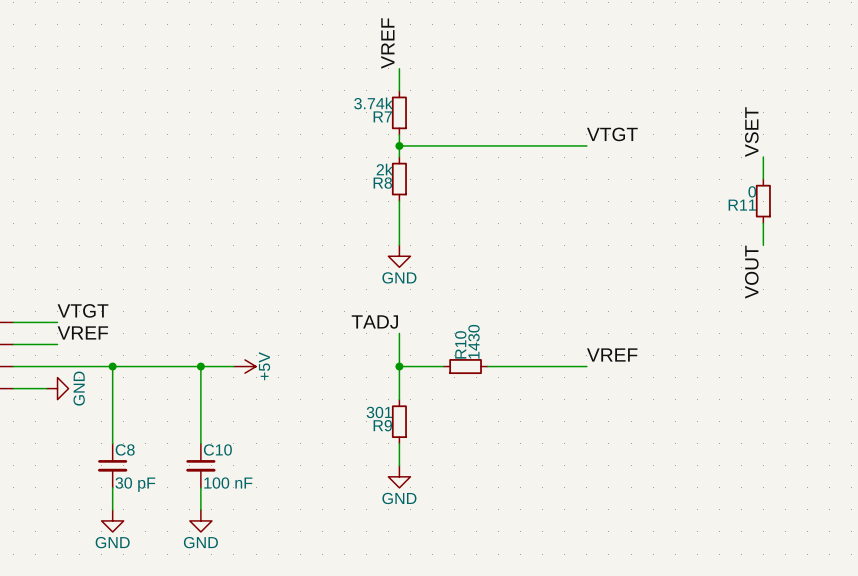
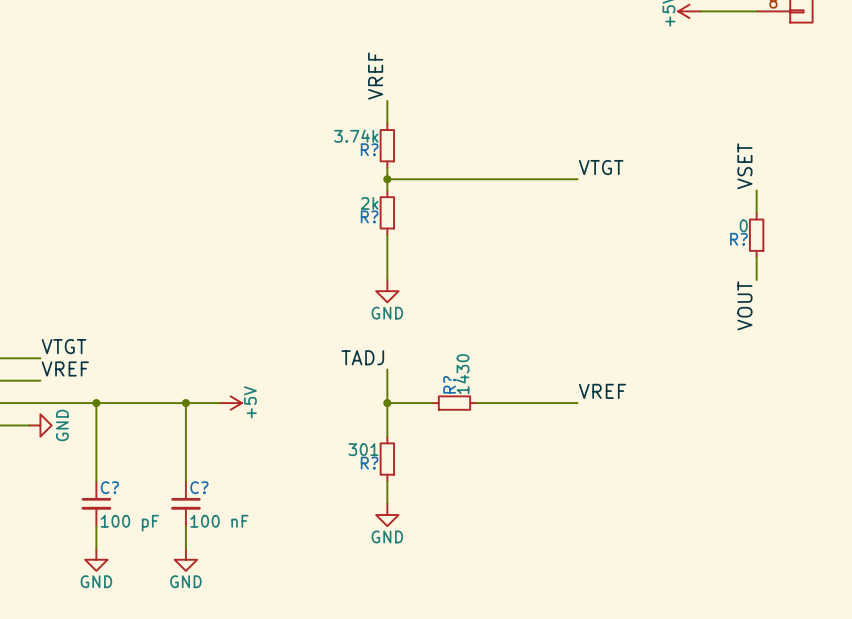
R7 name: R7 (382, 116) -> R? (369, 149)
R8 name: R8 (382, 183) -> R? (369, 216)
R11 name: R11 (742, 205) -> R? (738, 239)
R10 name: R10 (460, 344) -> R? (449, 384)
R9 name: R9 (382, 425) -> R? (369, 463)
C8 name: C8 (125, 449) -> C? (109, 487)
C10 name: C10 (217, 449) -> C? (199, 487)
C8 value: 30 pF (135, 484) -> 100 pF (129, 523)

